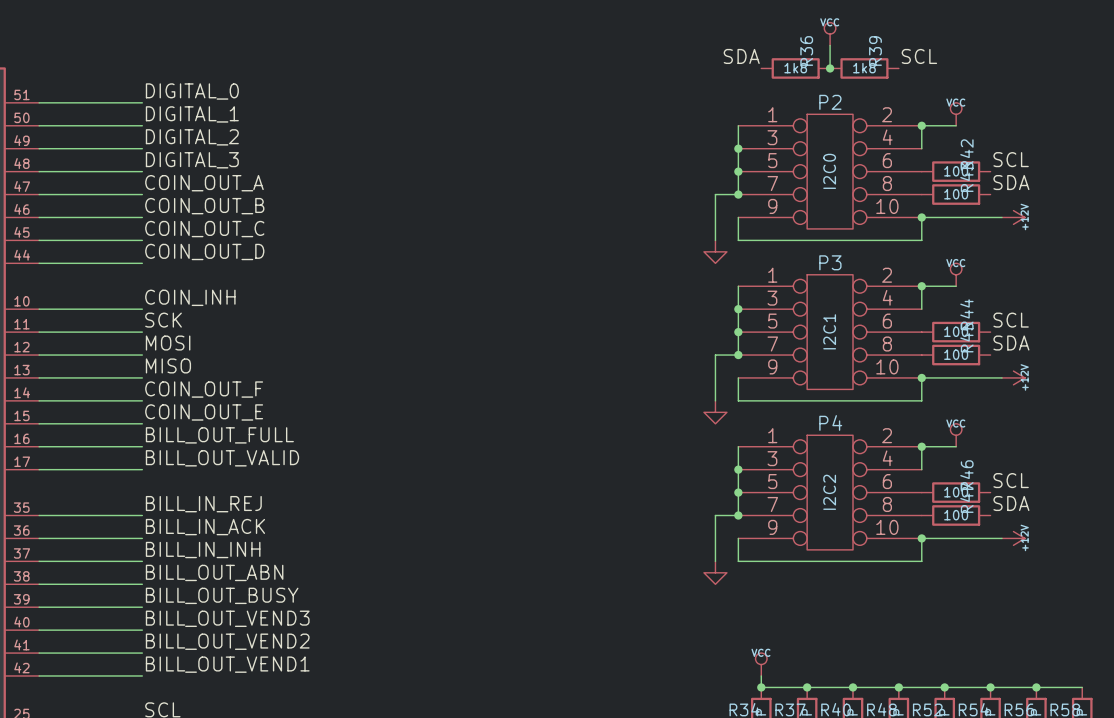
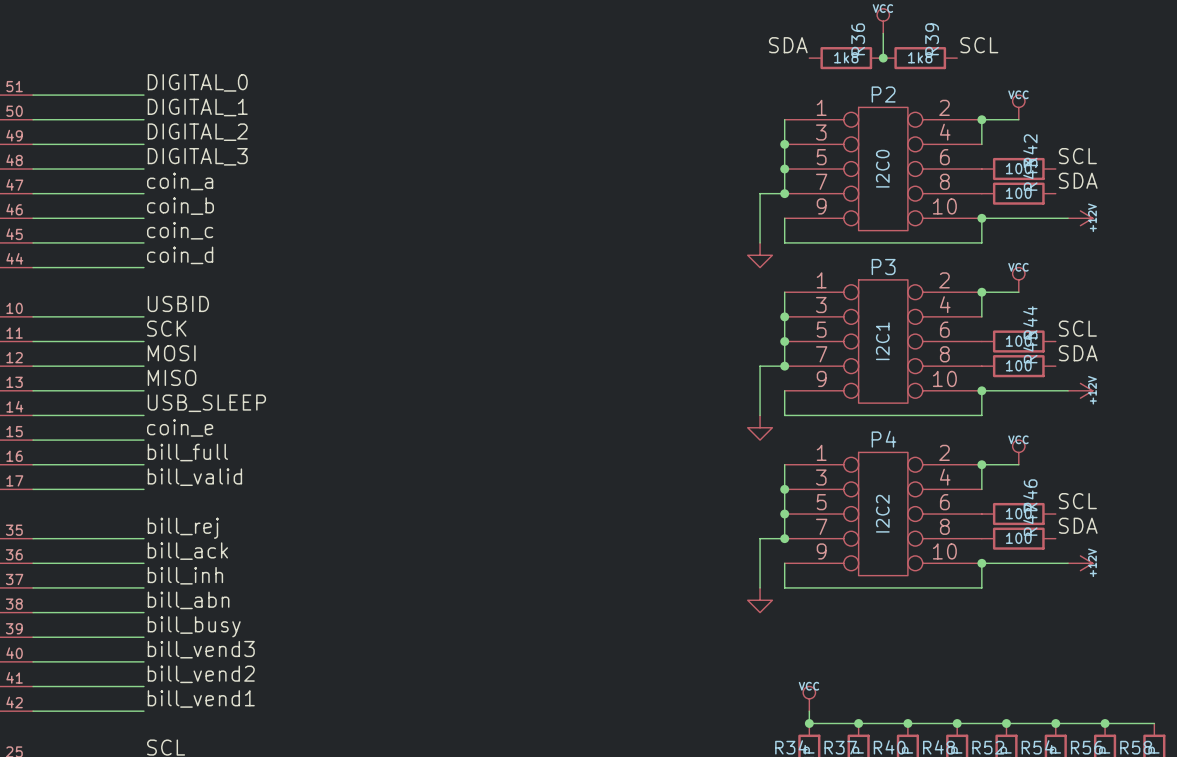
label: COIN_OUT_A (204, 183) -> coin_a (180, 181)
label: COIN_OUT_B (204, 206) -> coin_b (180, 206)
label: COIN_OUT_C (204, 229) -> coin_c (180, 230)
label: COIN_OUT_D (204, 251) -> coin_d (180, 255)
label: COIN_INH (190, 297) -> USBID (178, 303)
label: COIN_OUT_F (204, 389) -> USB_SLEEP (206, 403)
label: COIN_OUT_E (204, 412) -> coin_e (180, 427)
label: BILL_OUT_FULL (219, 435) -> bill_full (187, 452)
label: BILL_OUT_VALID (222, 458) -> bill_valid (194, 477)
label: BILL_IN_REJ (203, 504) -> bill_rej (183, 528)
label: BILL_IN_ACK (205, 527) -> bill_ack (187, 551)
label: BILL_IN_INH (203, 550) -> bill_inh (185, 575)
label: BILL_OUT_ABN (214, 572) -> bill_abn (188, 600)
label: BILL_OUT_BUSY (222, 595) -> bill_busy (194, 626)
label: BILL_OUT_VEND3 (227, 618) -> bill_vend3 (201, 649)
label: BILL_OUT_VEND2 (227, 641) -> bill_vend2 (201, 674)
label: BILL_OUT_VEND1 (227, 664) -> bill_vend1 (201, 698)

